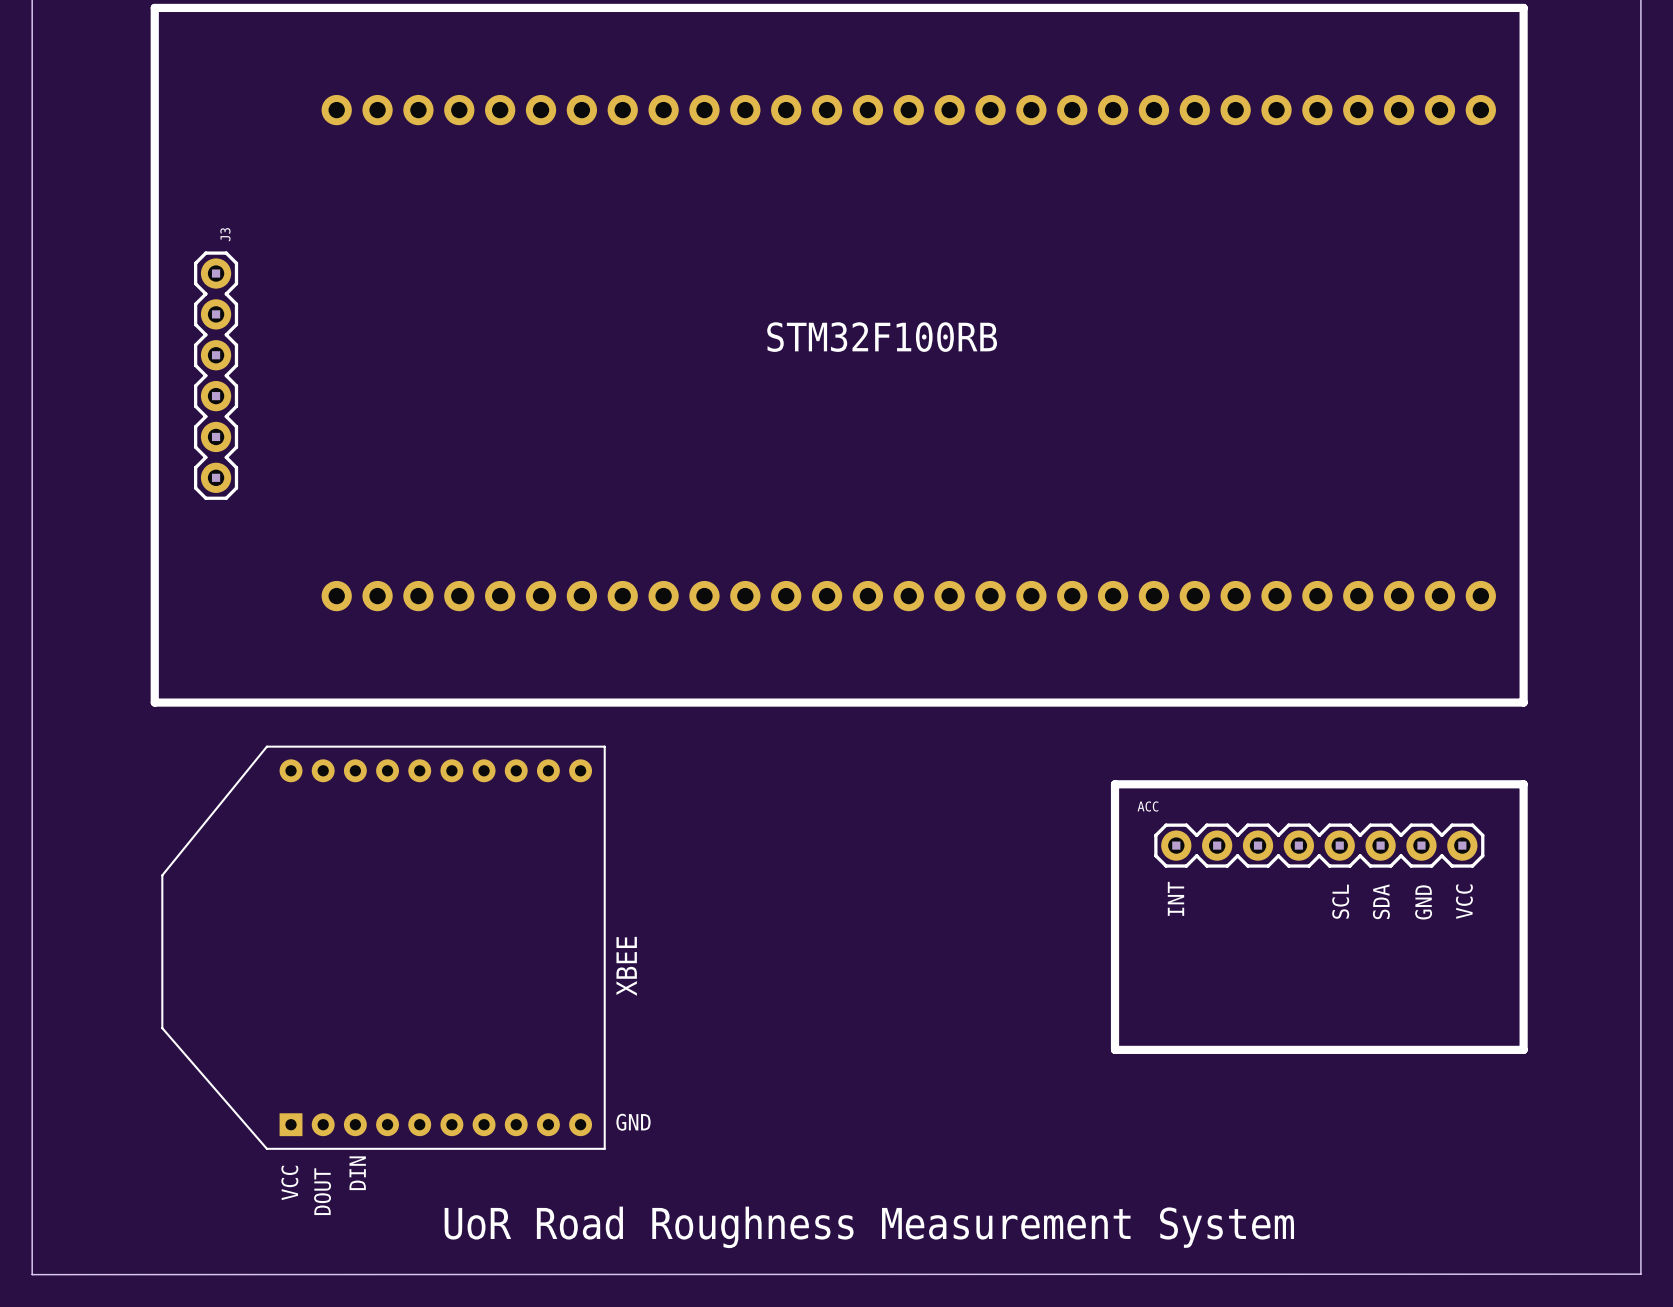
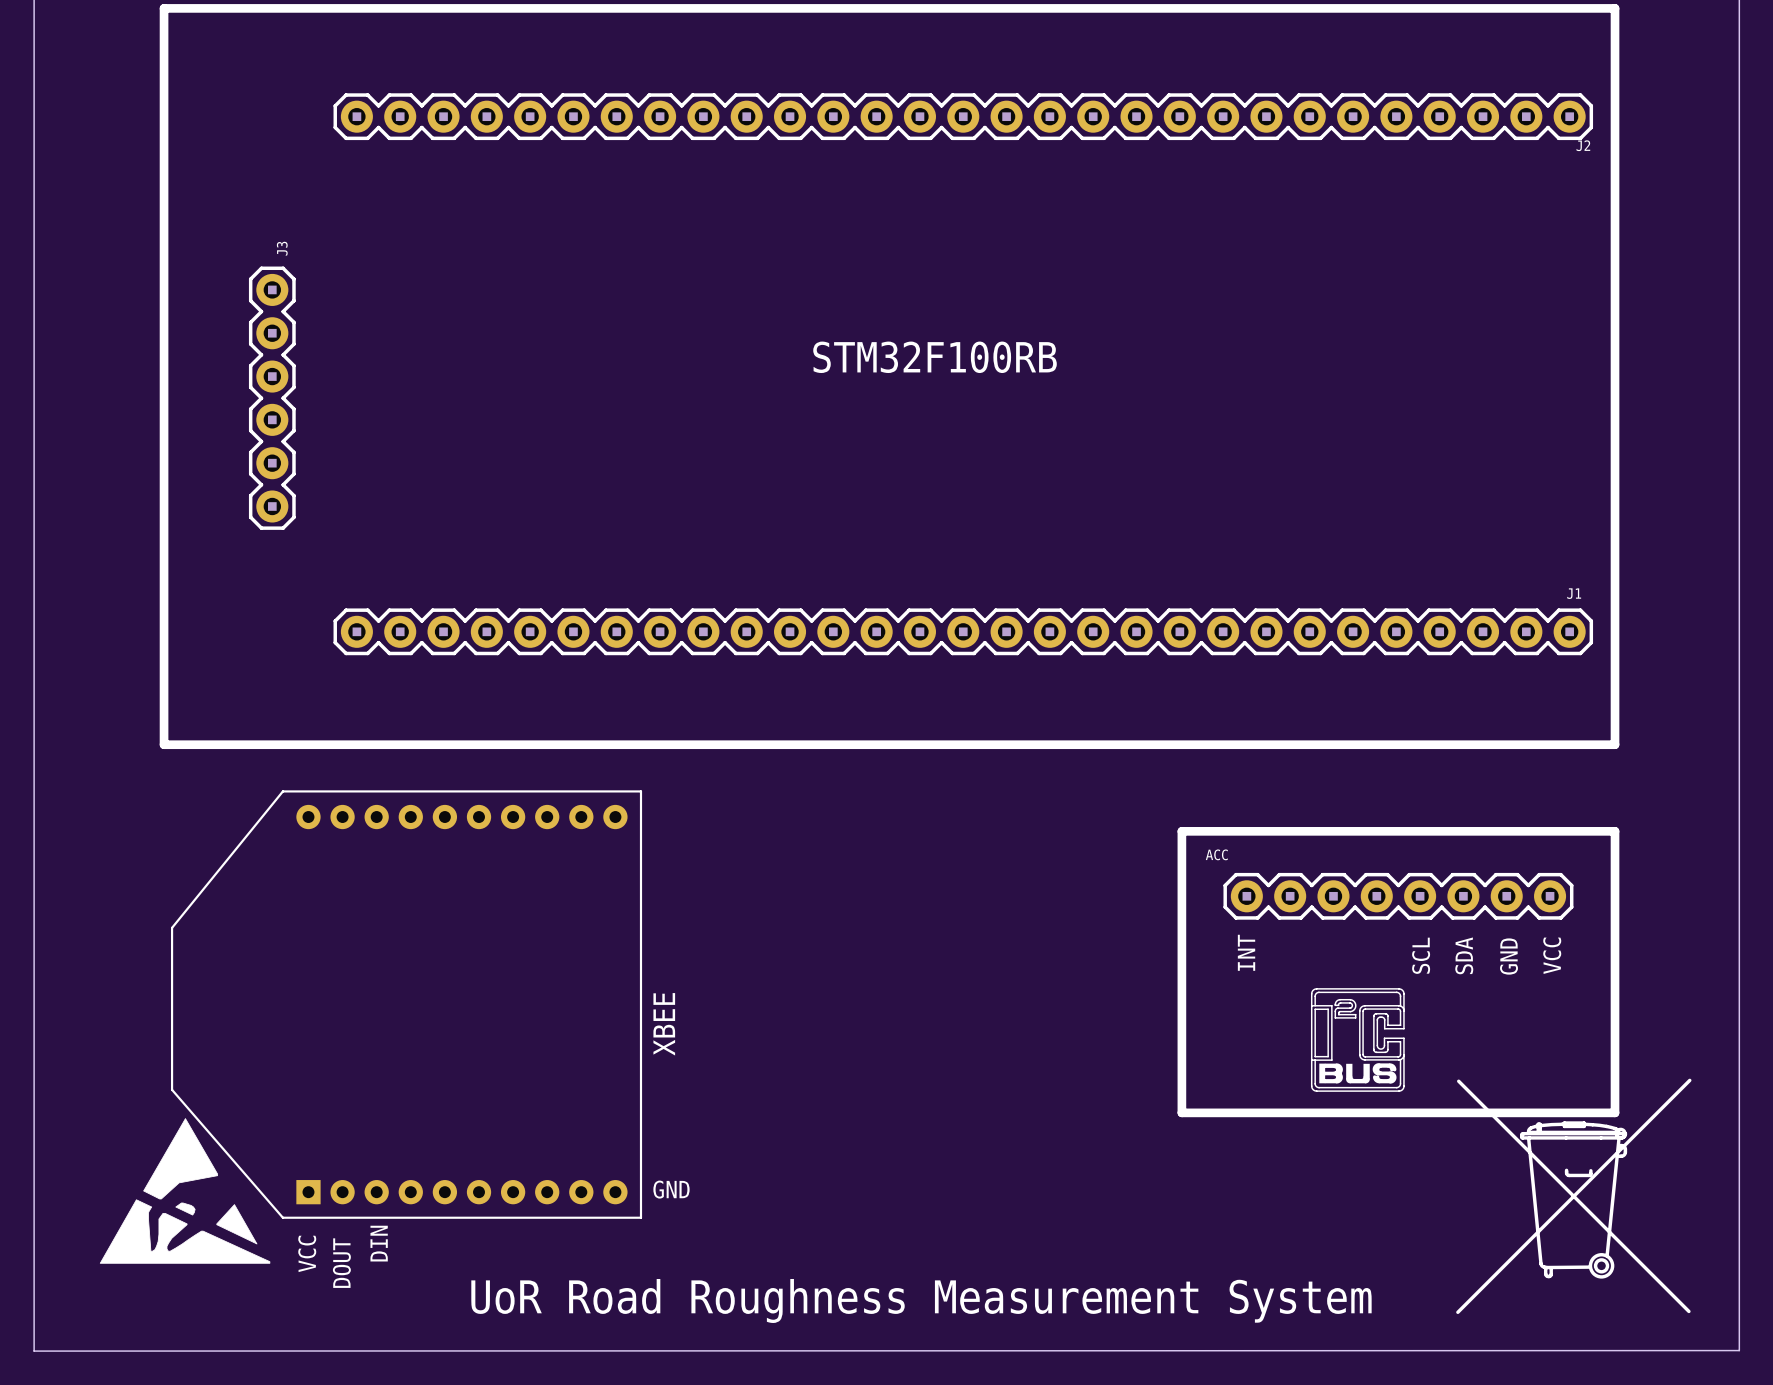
J2 side: bottom (908, 110) -> top (963, 116)
J3 position: (216, 375) -> (272, 398)
J1 side: bottom (908, 596) -> top (963, 631)
part: none -> (1357, 1039)
drawing: none -> [1456, 1078, 1692, 1315]
drawing: none -> [99, 1118, 271, 1264]

